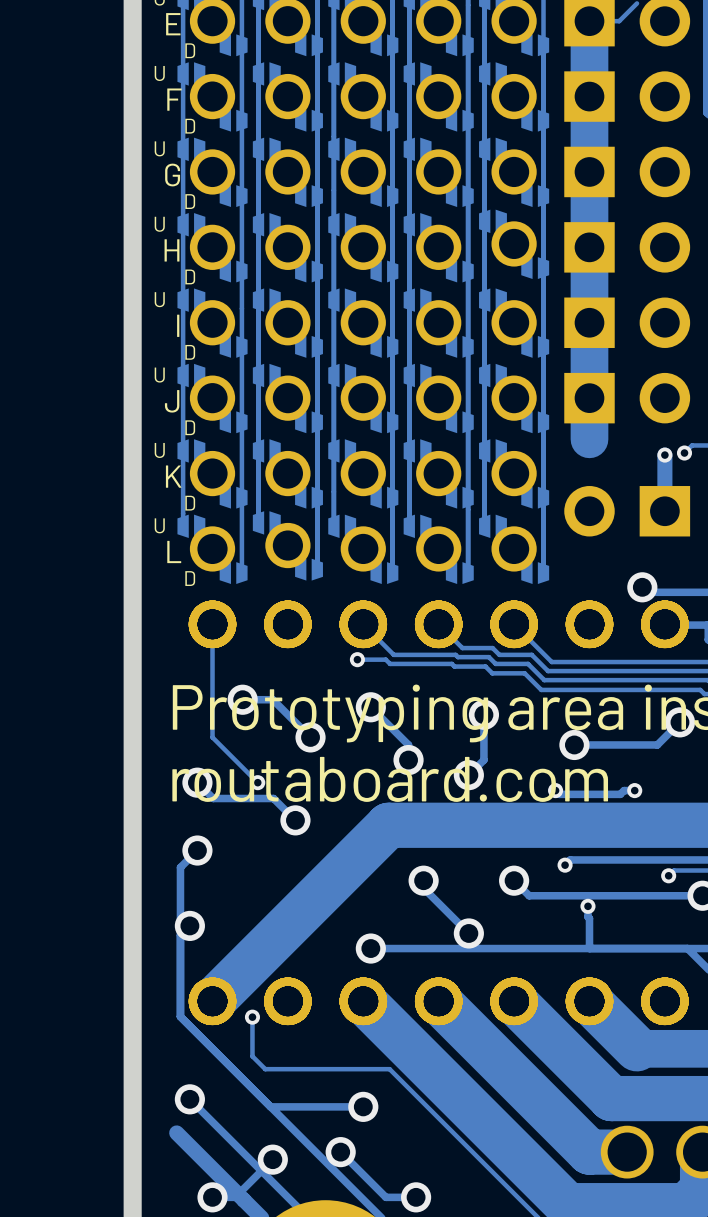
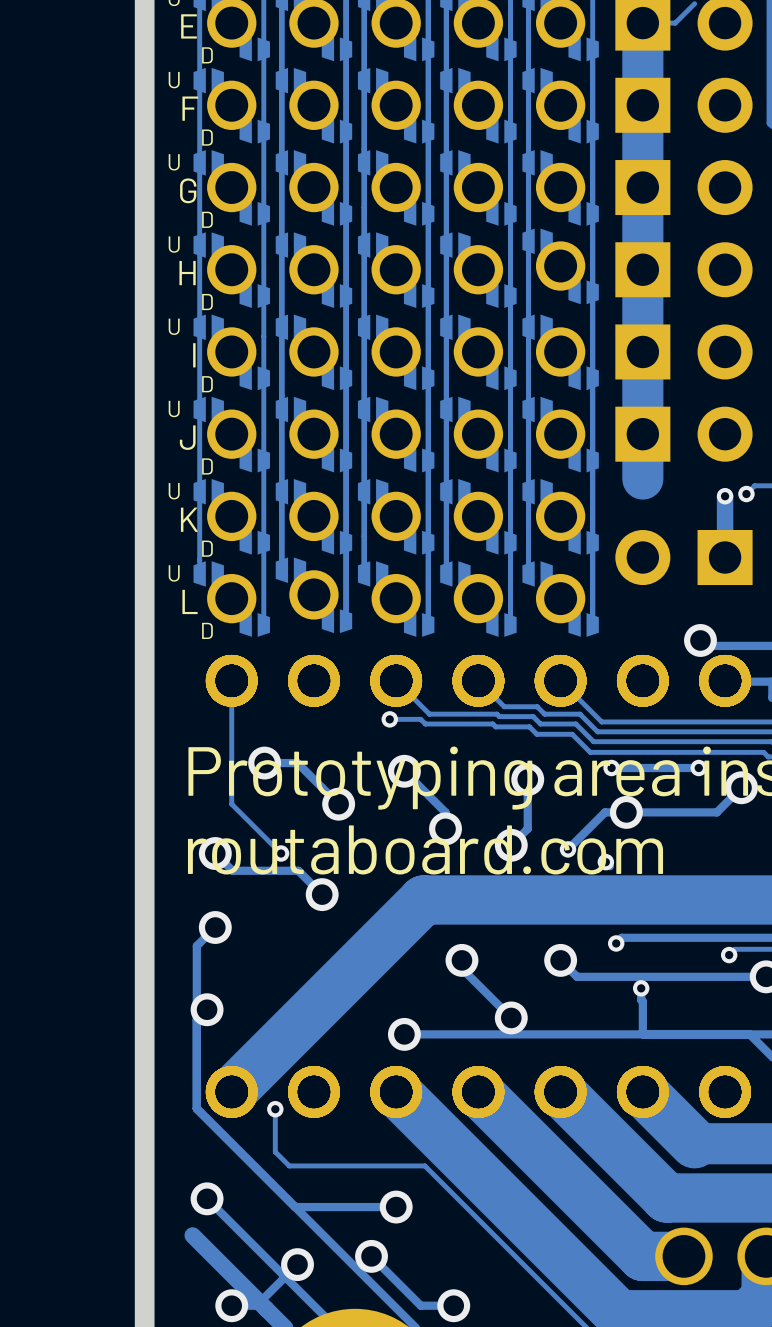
via: none -> (611, 768)
track: none -> (698, 768) (611, 768)
via: none -> (698, 768)
track: none -> (626, 812) (605, 812) (568, 849)
via: none -> (568, 849)
track: (634, 790) (624, 790) (620, 794) (559, 794) -> none
via: (634, 790) -> none

